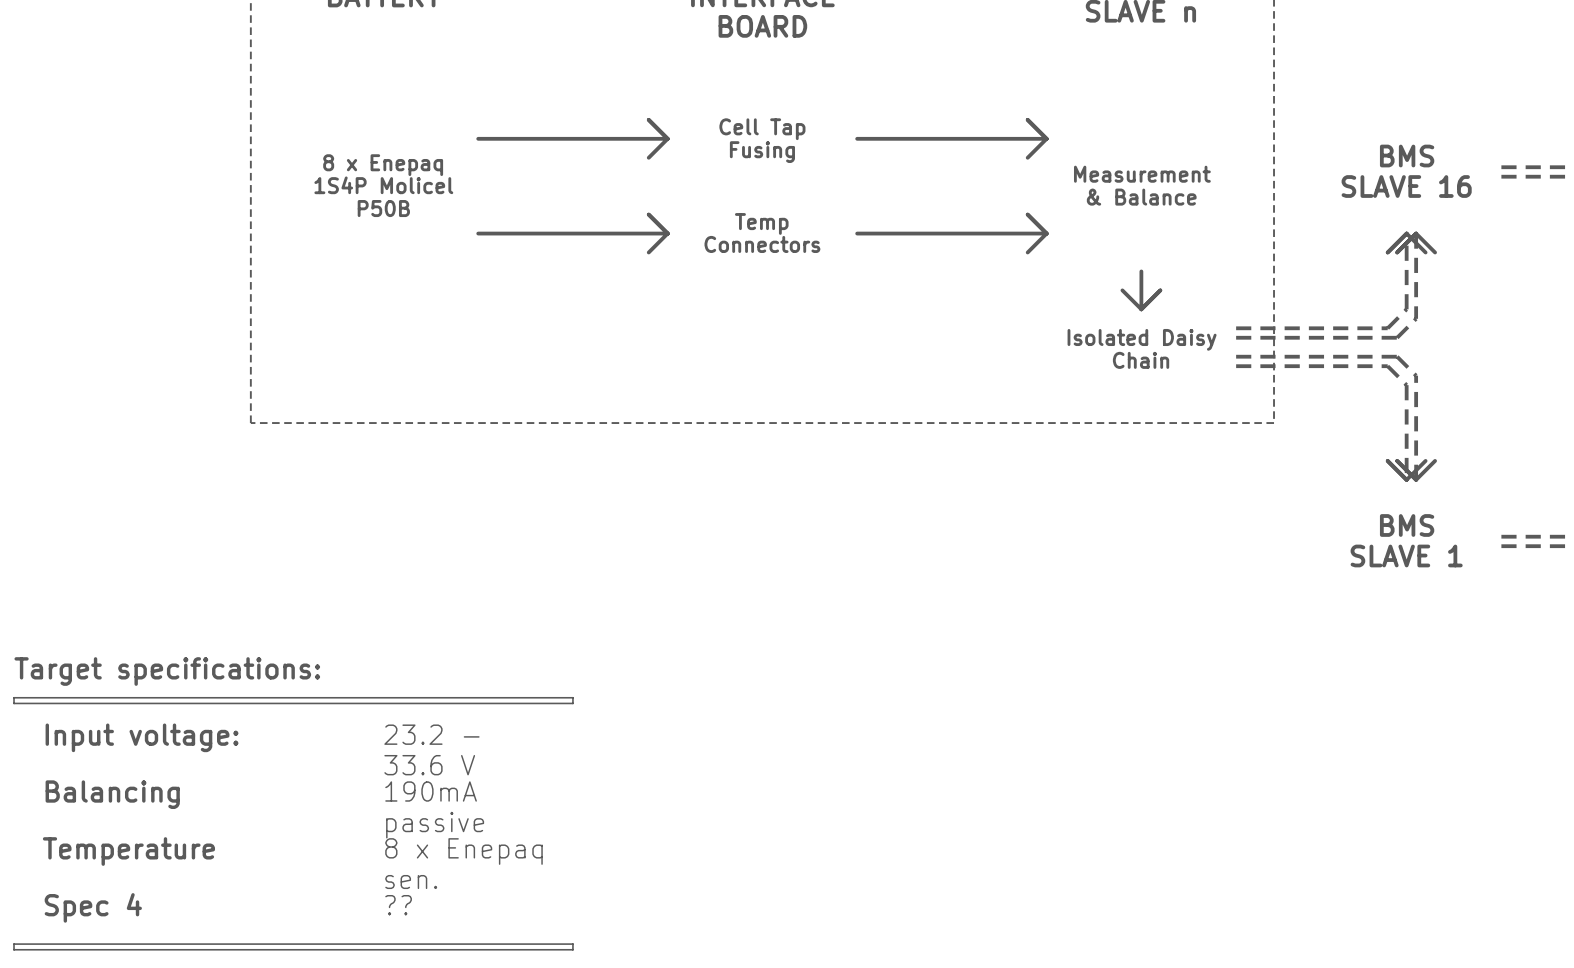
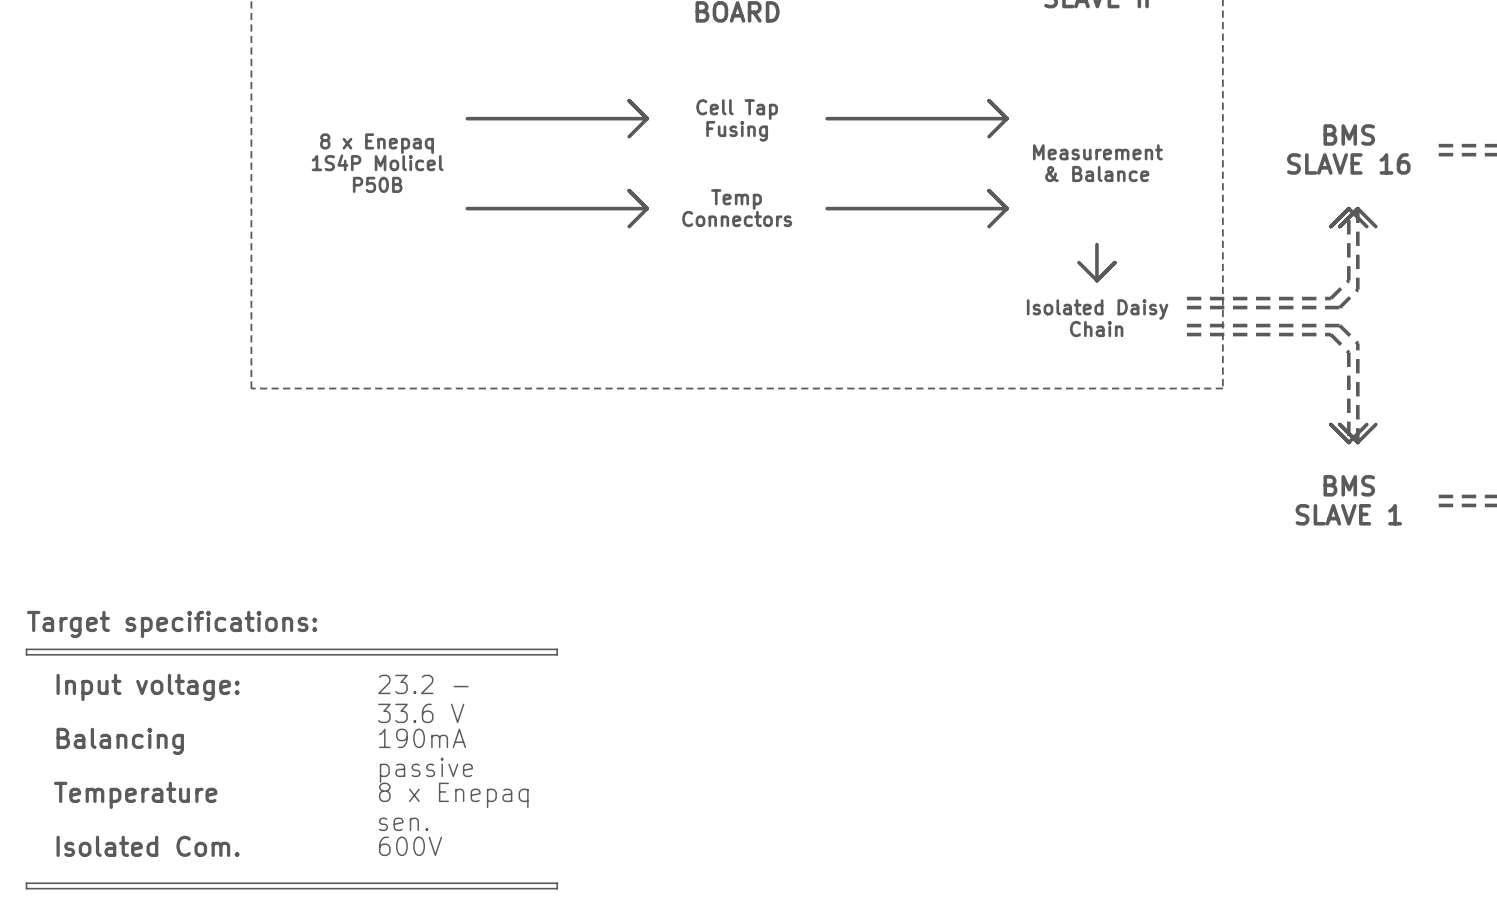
text: ?? (398, 905) -> 600V (410, 846)
text: Spec 4 (93, 907) -> Isolated Com. (148, 846)

